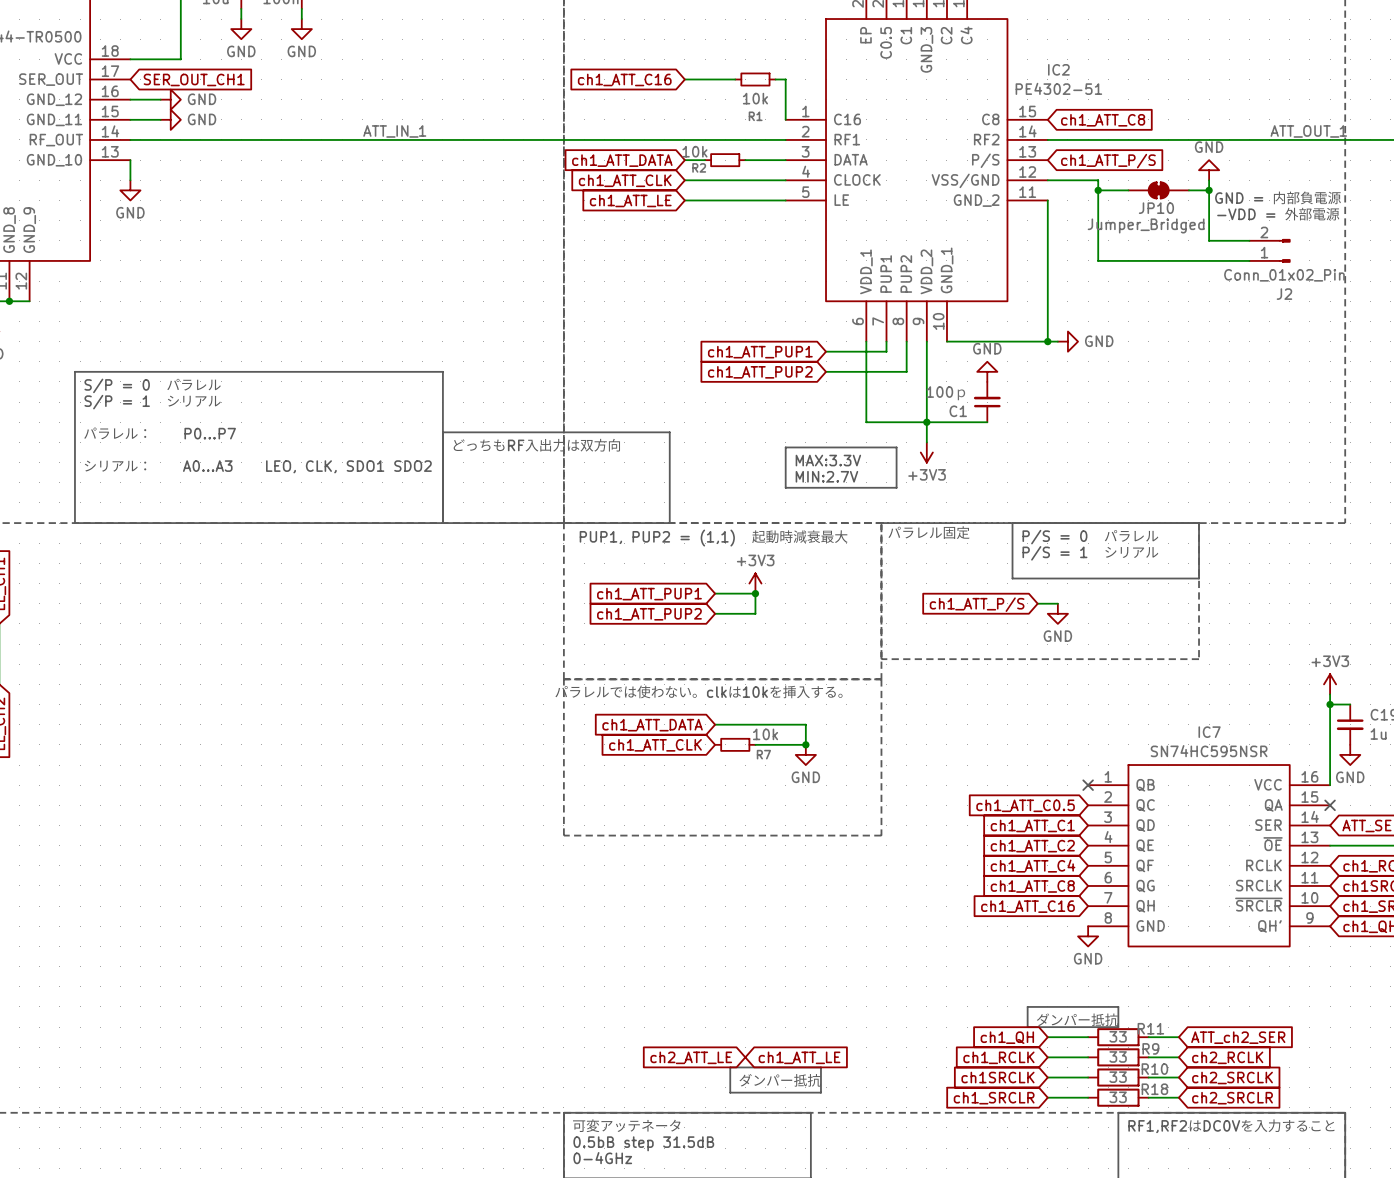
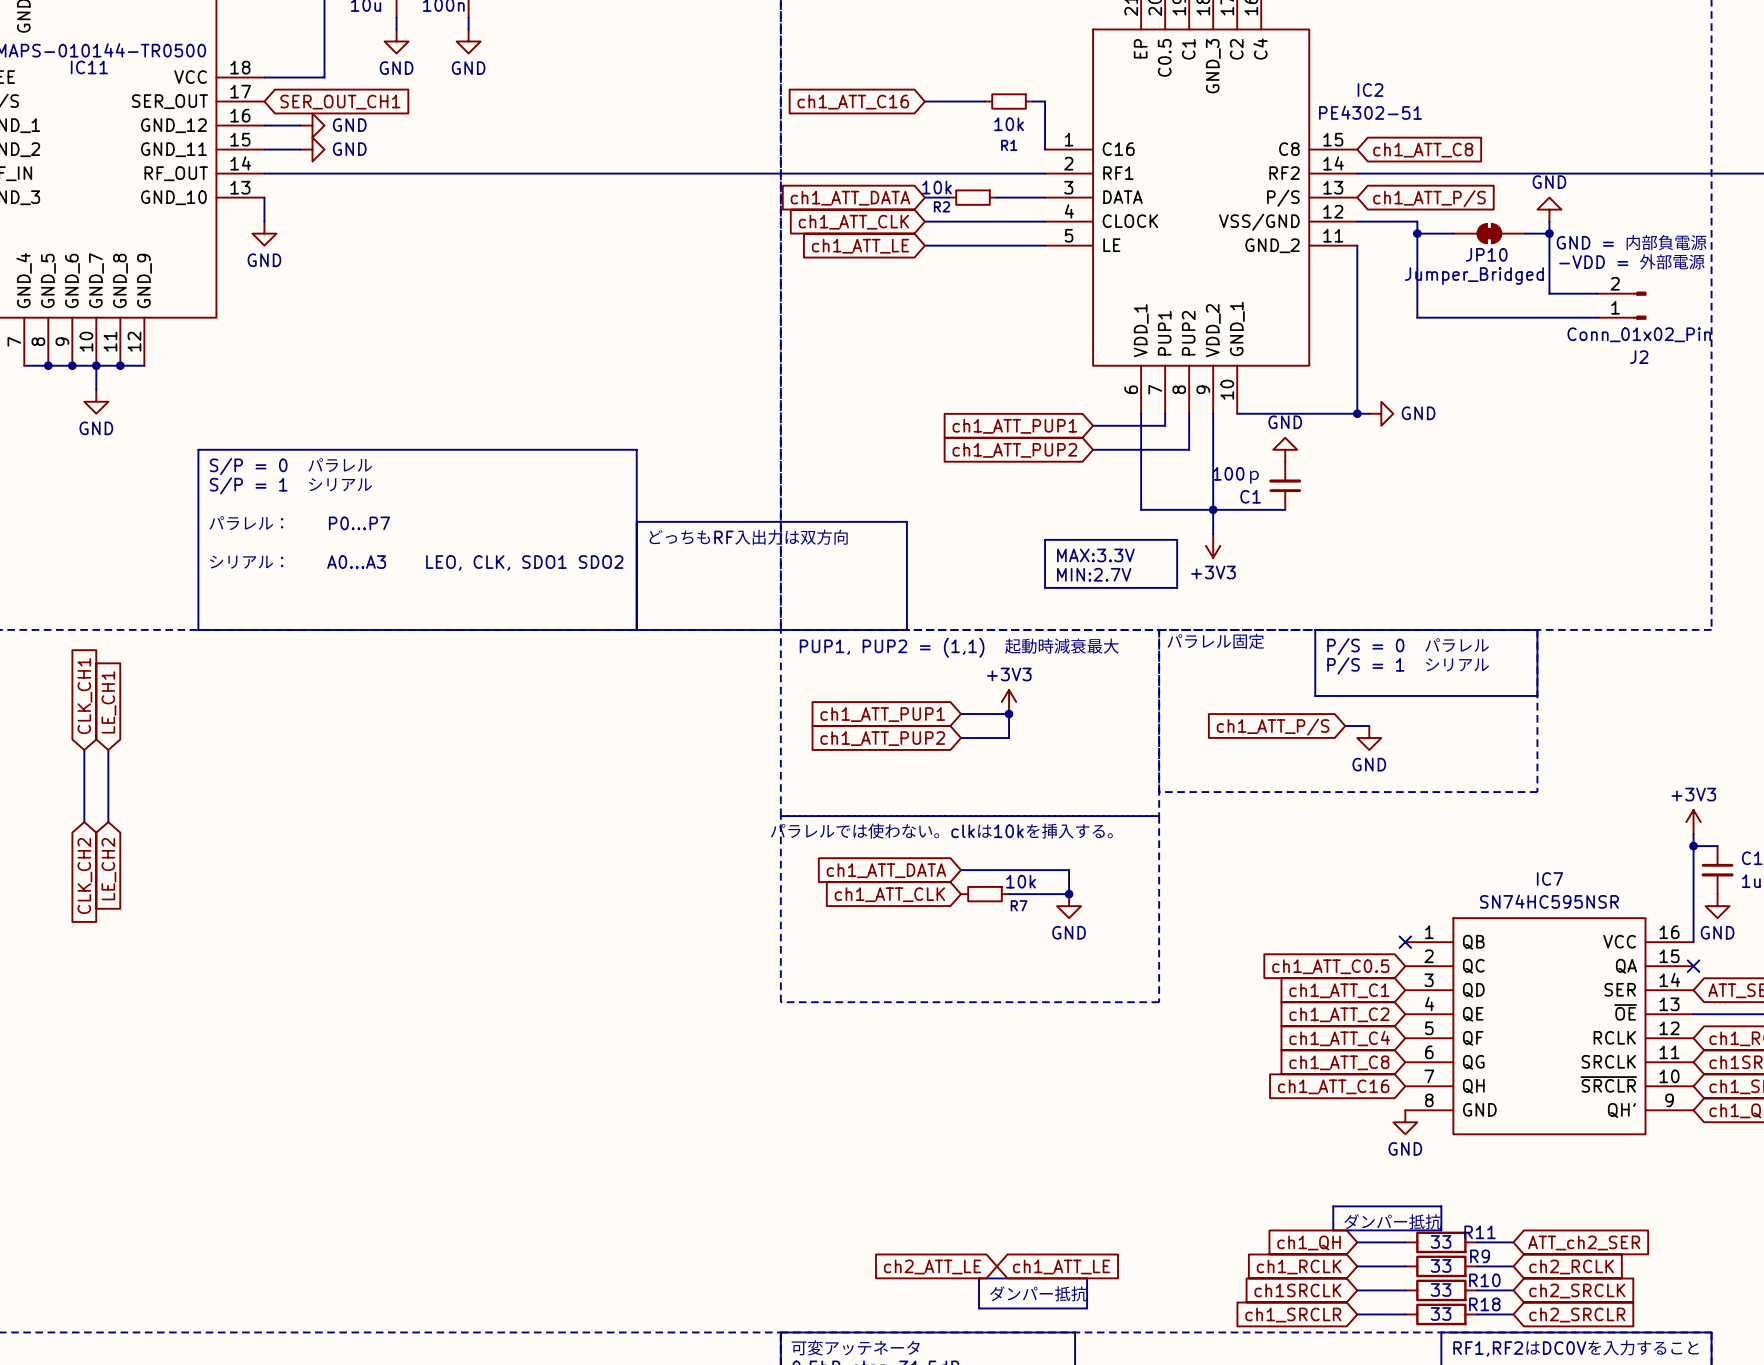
label: ATT_IN_1 (394, 131) -> none
label: ATT_OUT_1 (1308, 131) -> none

